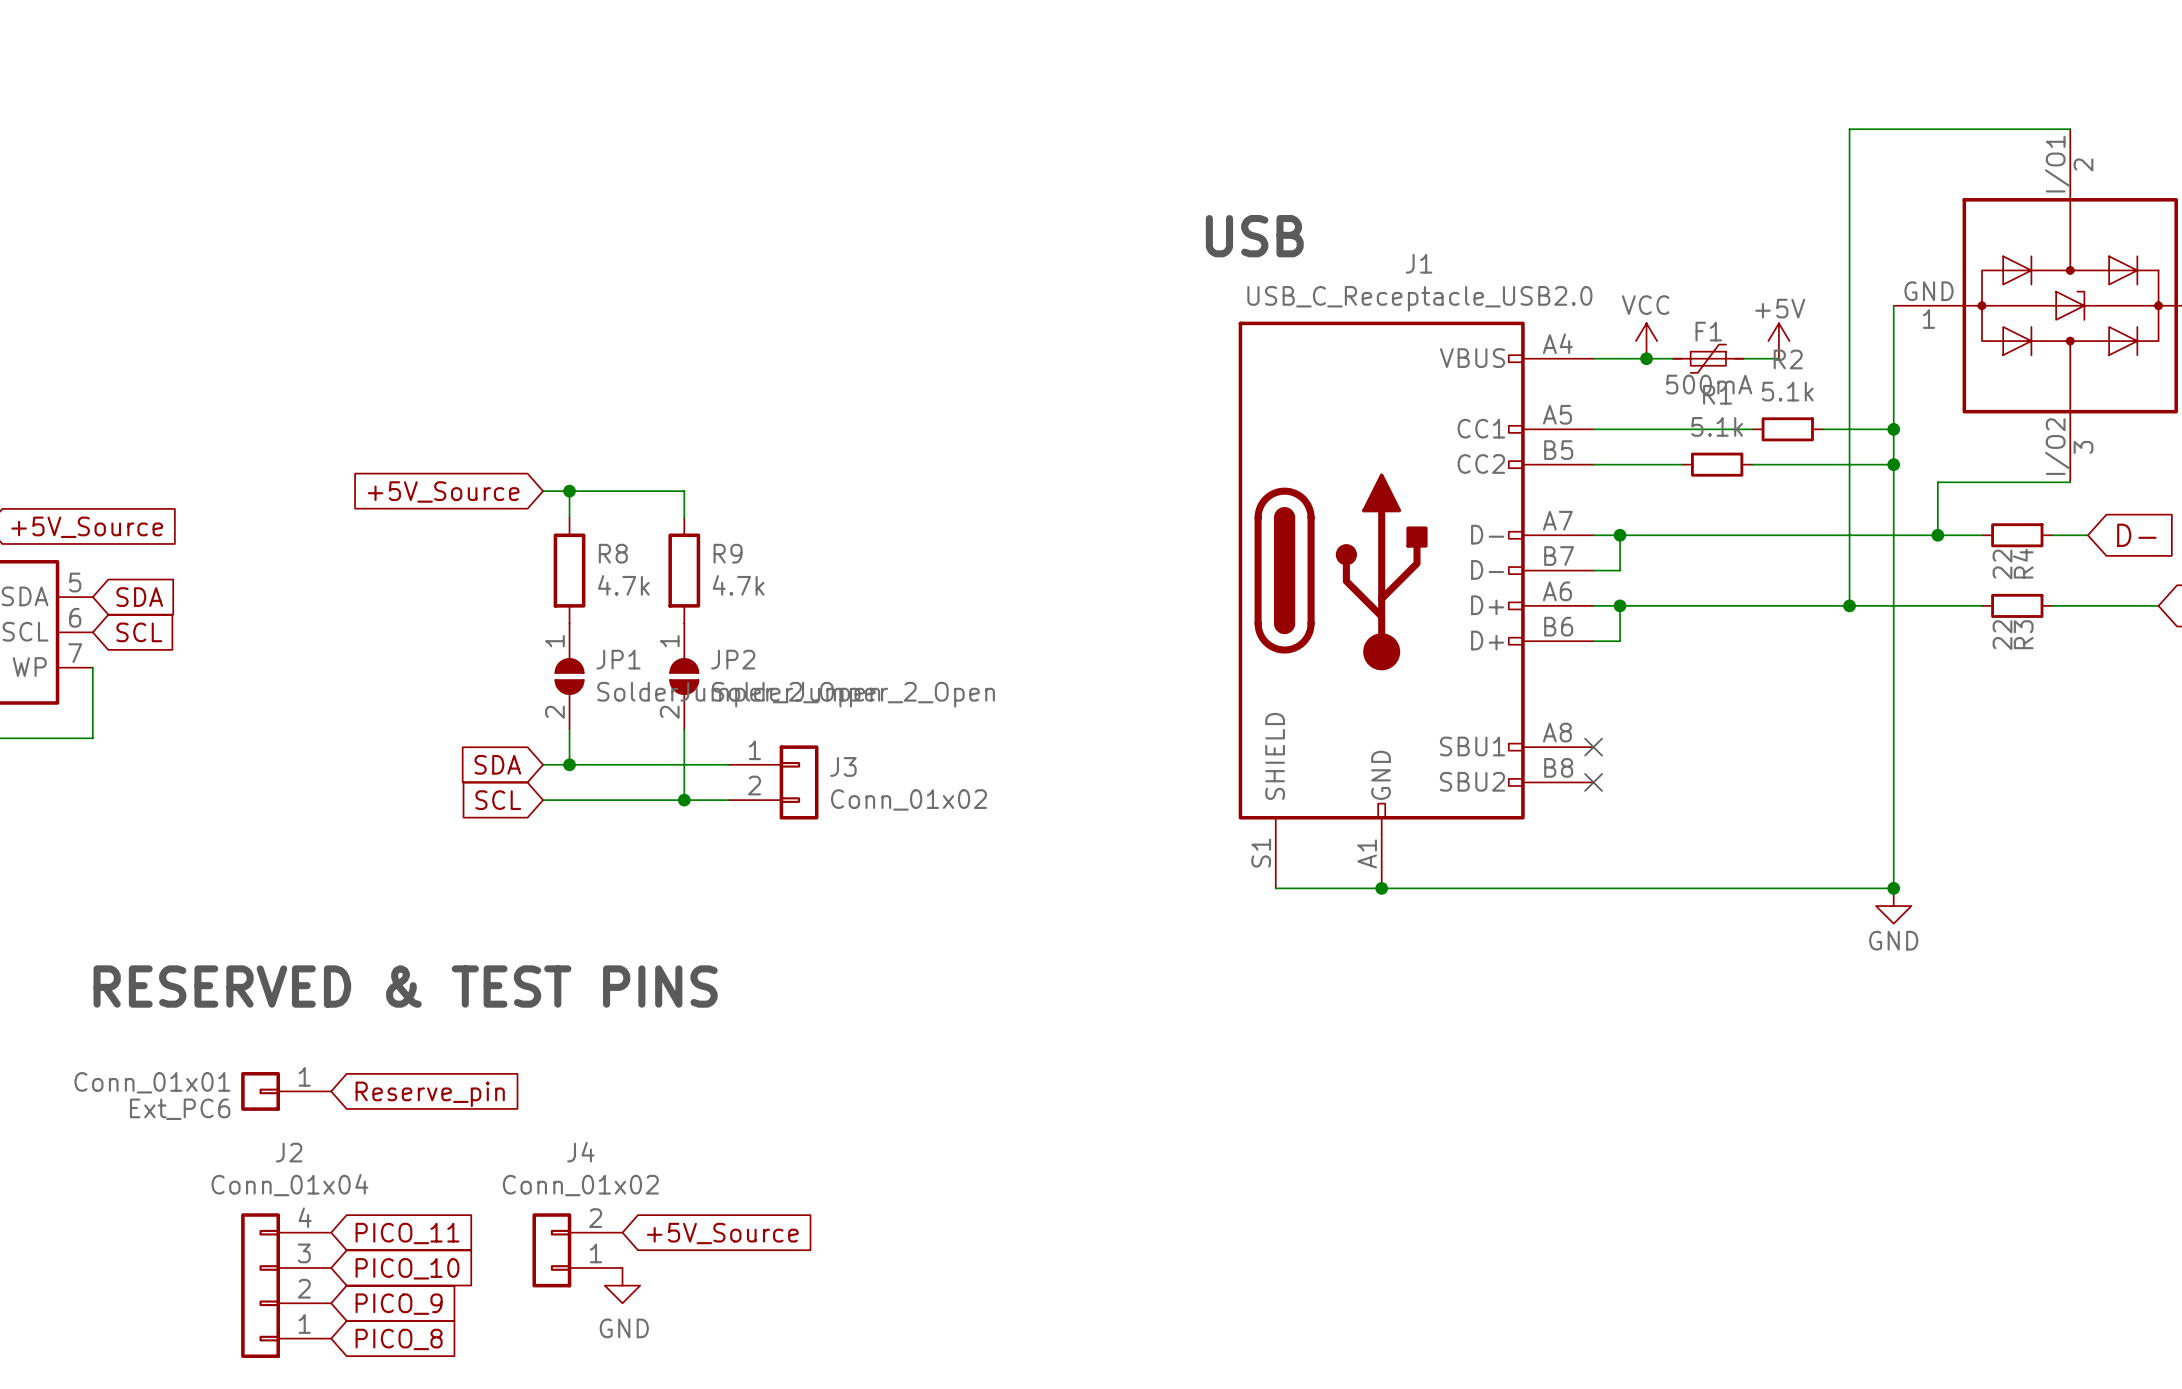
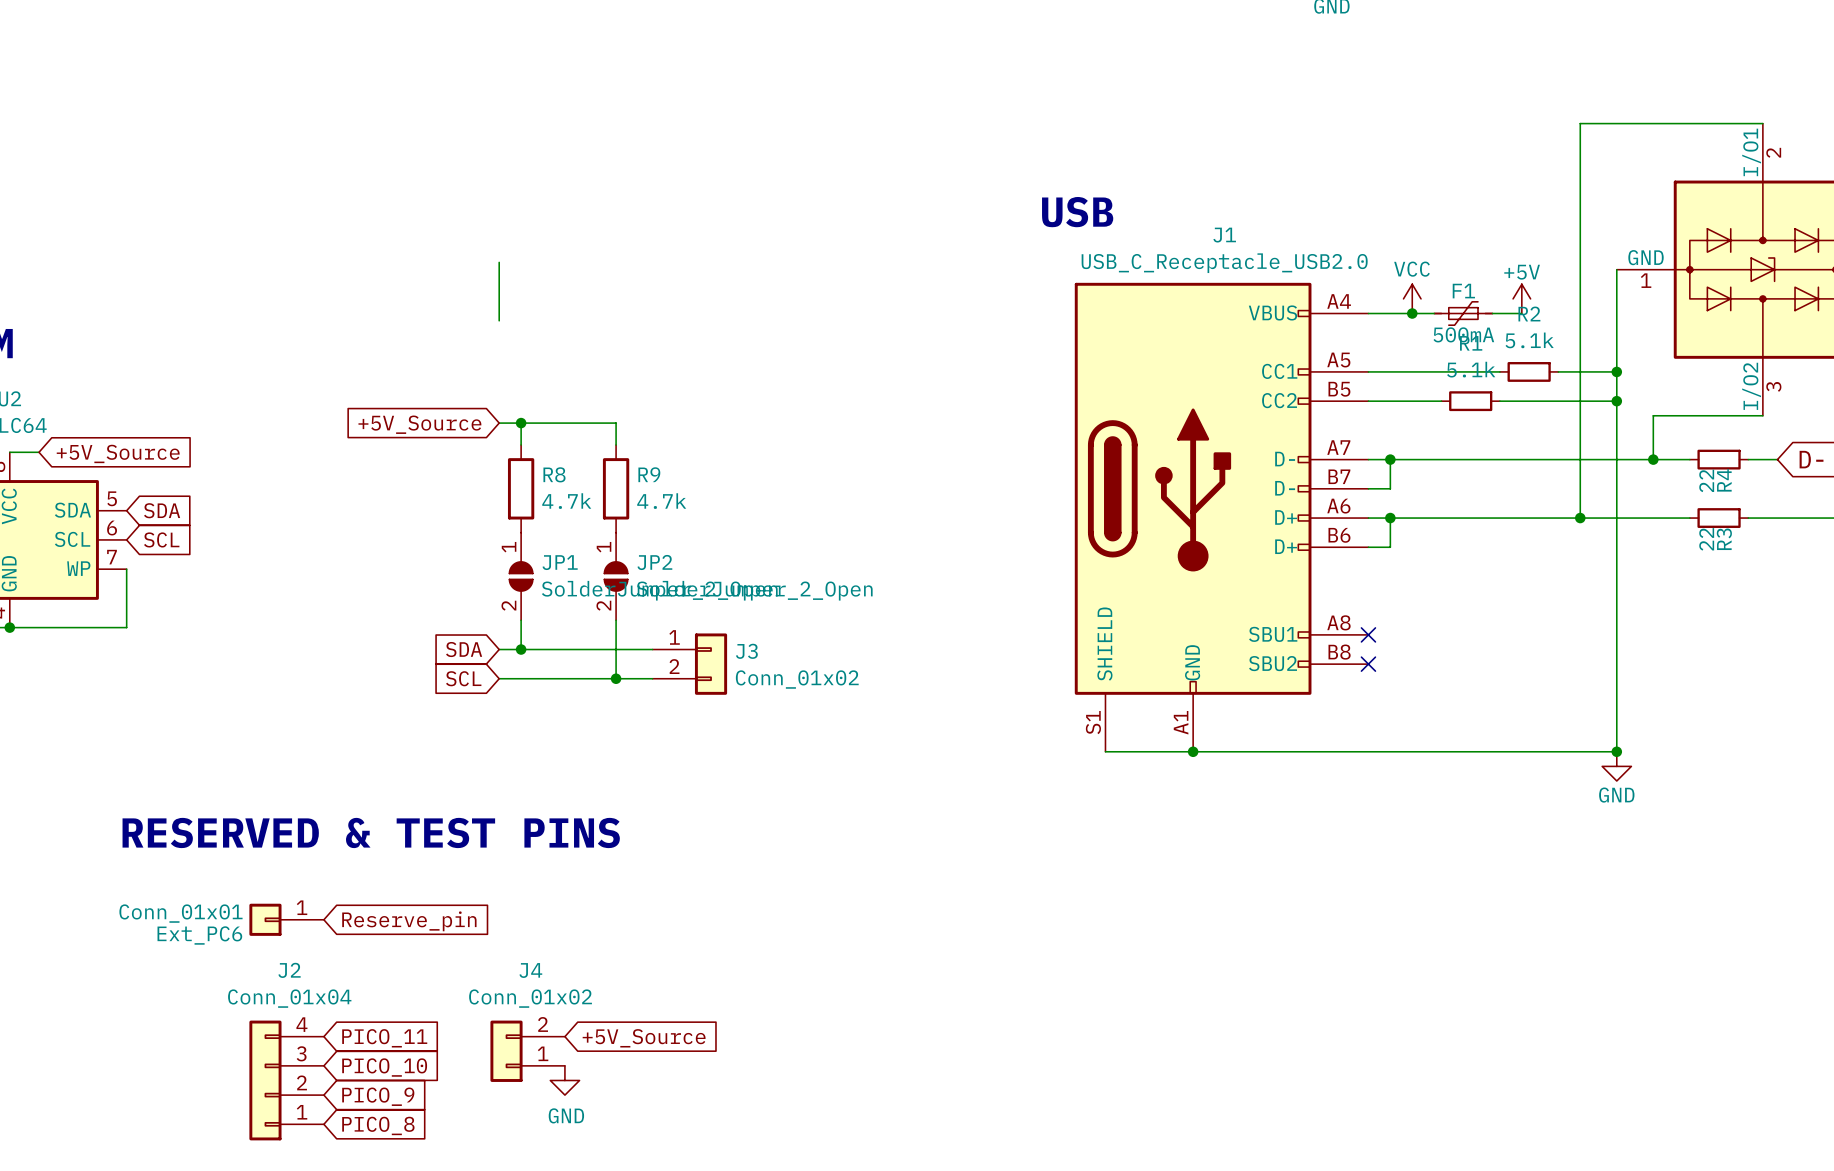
wire: none -> (499, 262) (499, 320)

